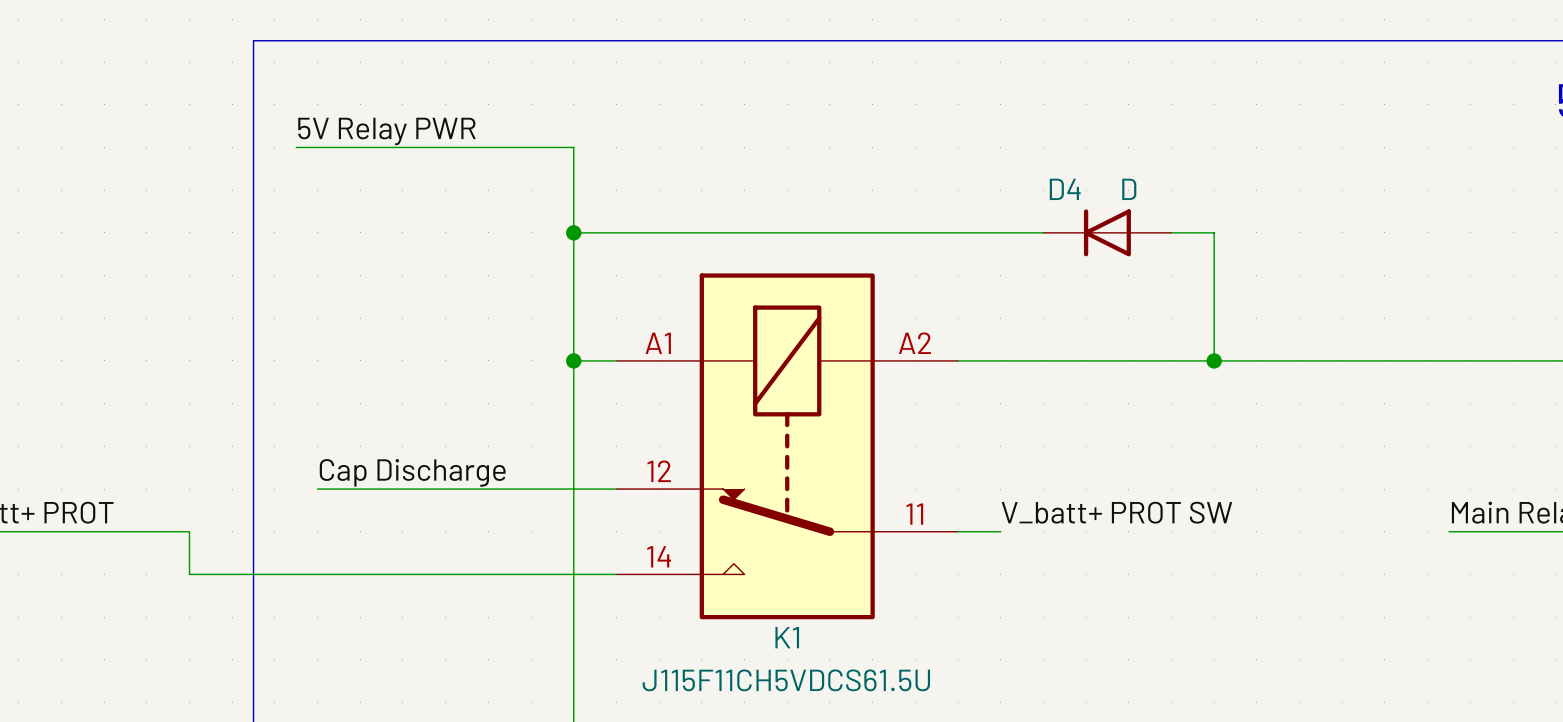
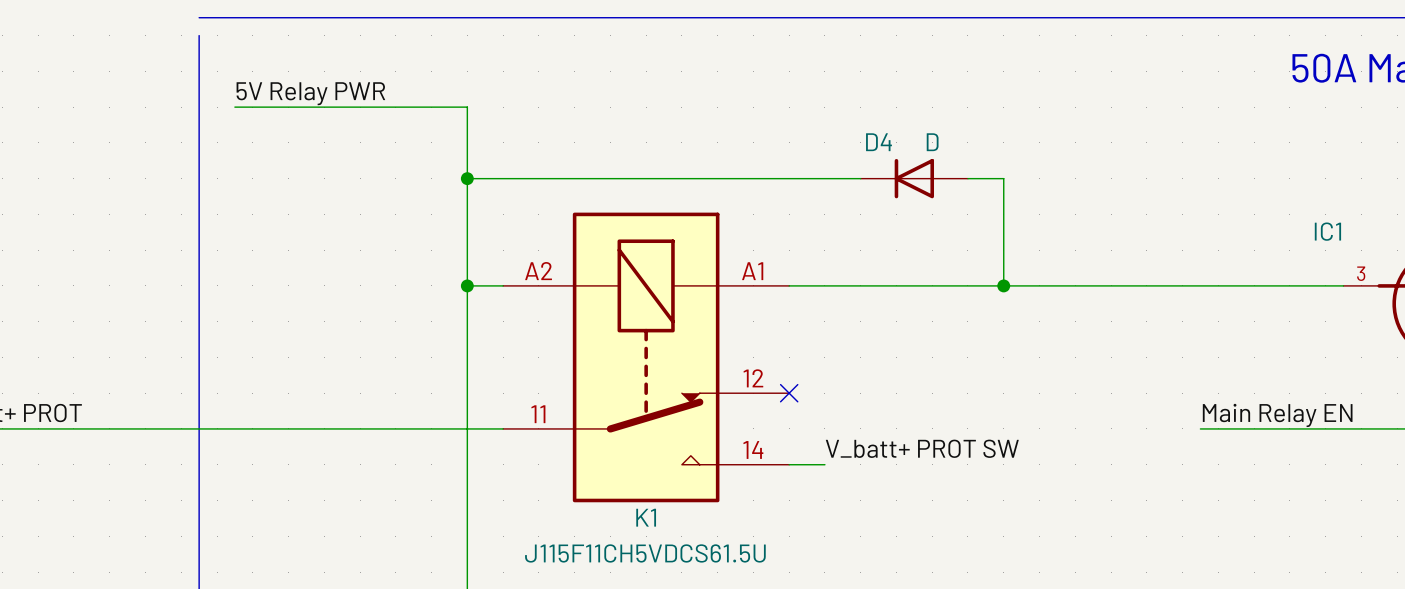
line: (253, 40) (253, 62) -> none
K1 flip: as is (787, 446) -> left-right (646, 357)
label: Cap Discharge (412, 472) -> none
wire: (317, 489) (616, 489) -> none
no-connect mark: none -> (789, 393)
label position: V_batt+ PROT SW (1116, 512) -> V_batt+ PROT SW (922, 448)
wire: (189, 531) (189, 574) (616, 574) -> (145, 428) (503, 428)
wire: (958, 531) (1000, 531) -> (789, 464) (824, 464)

